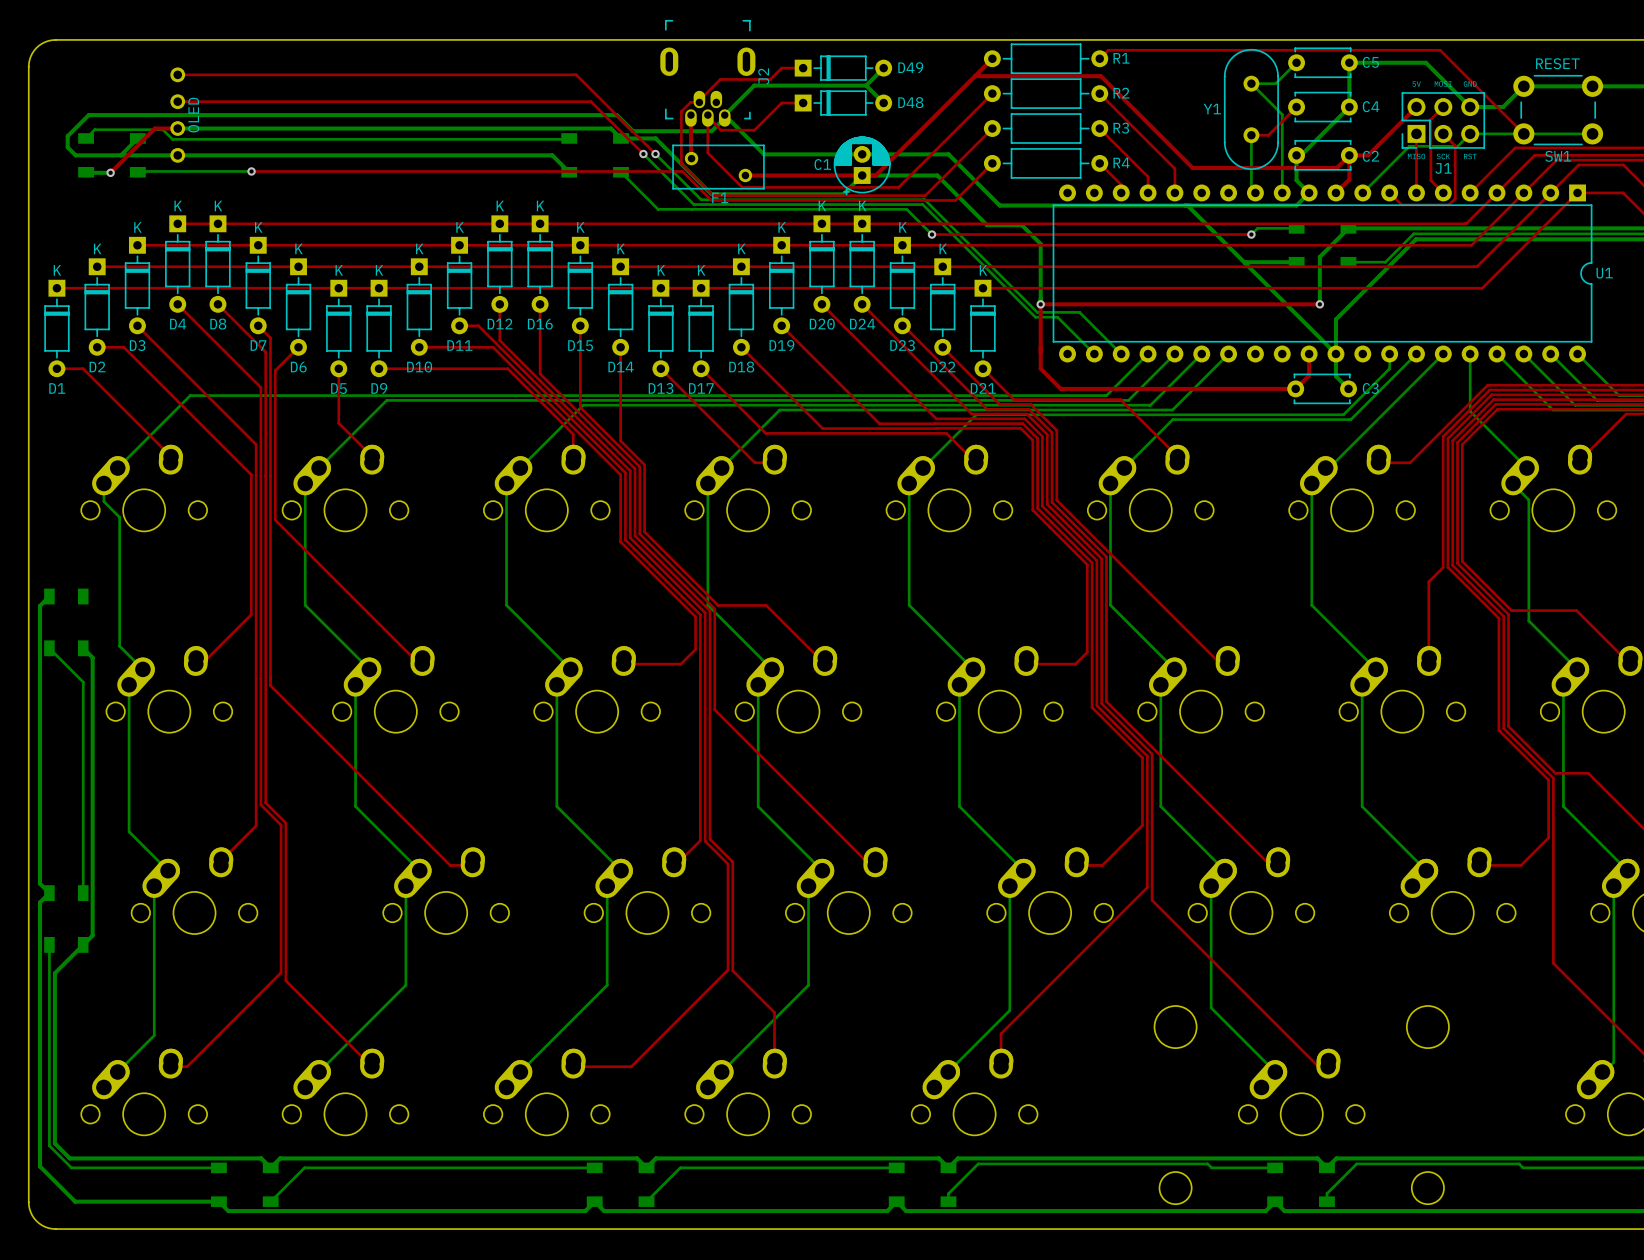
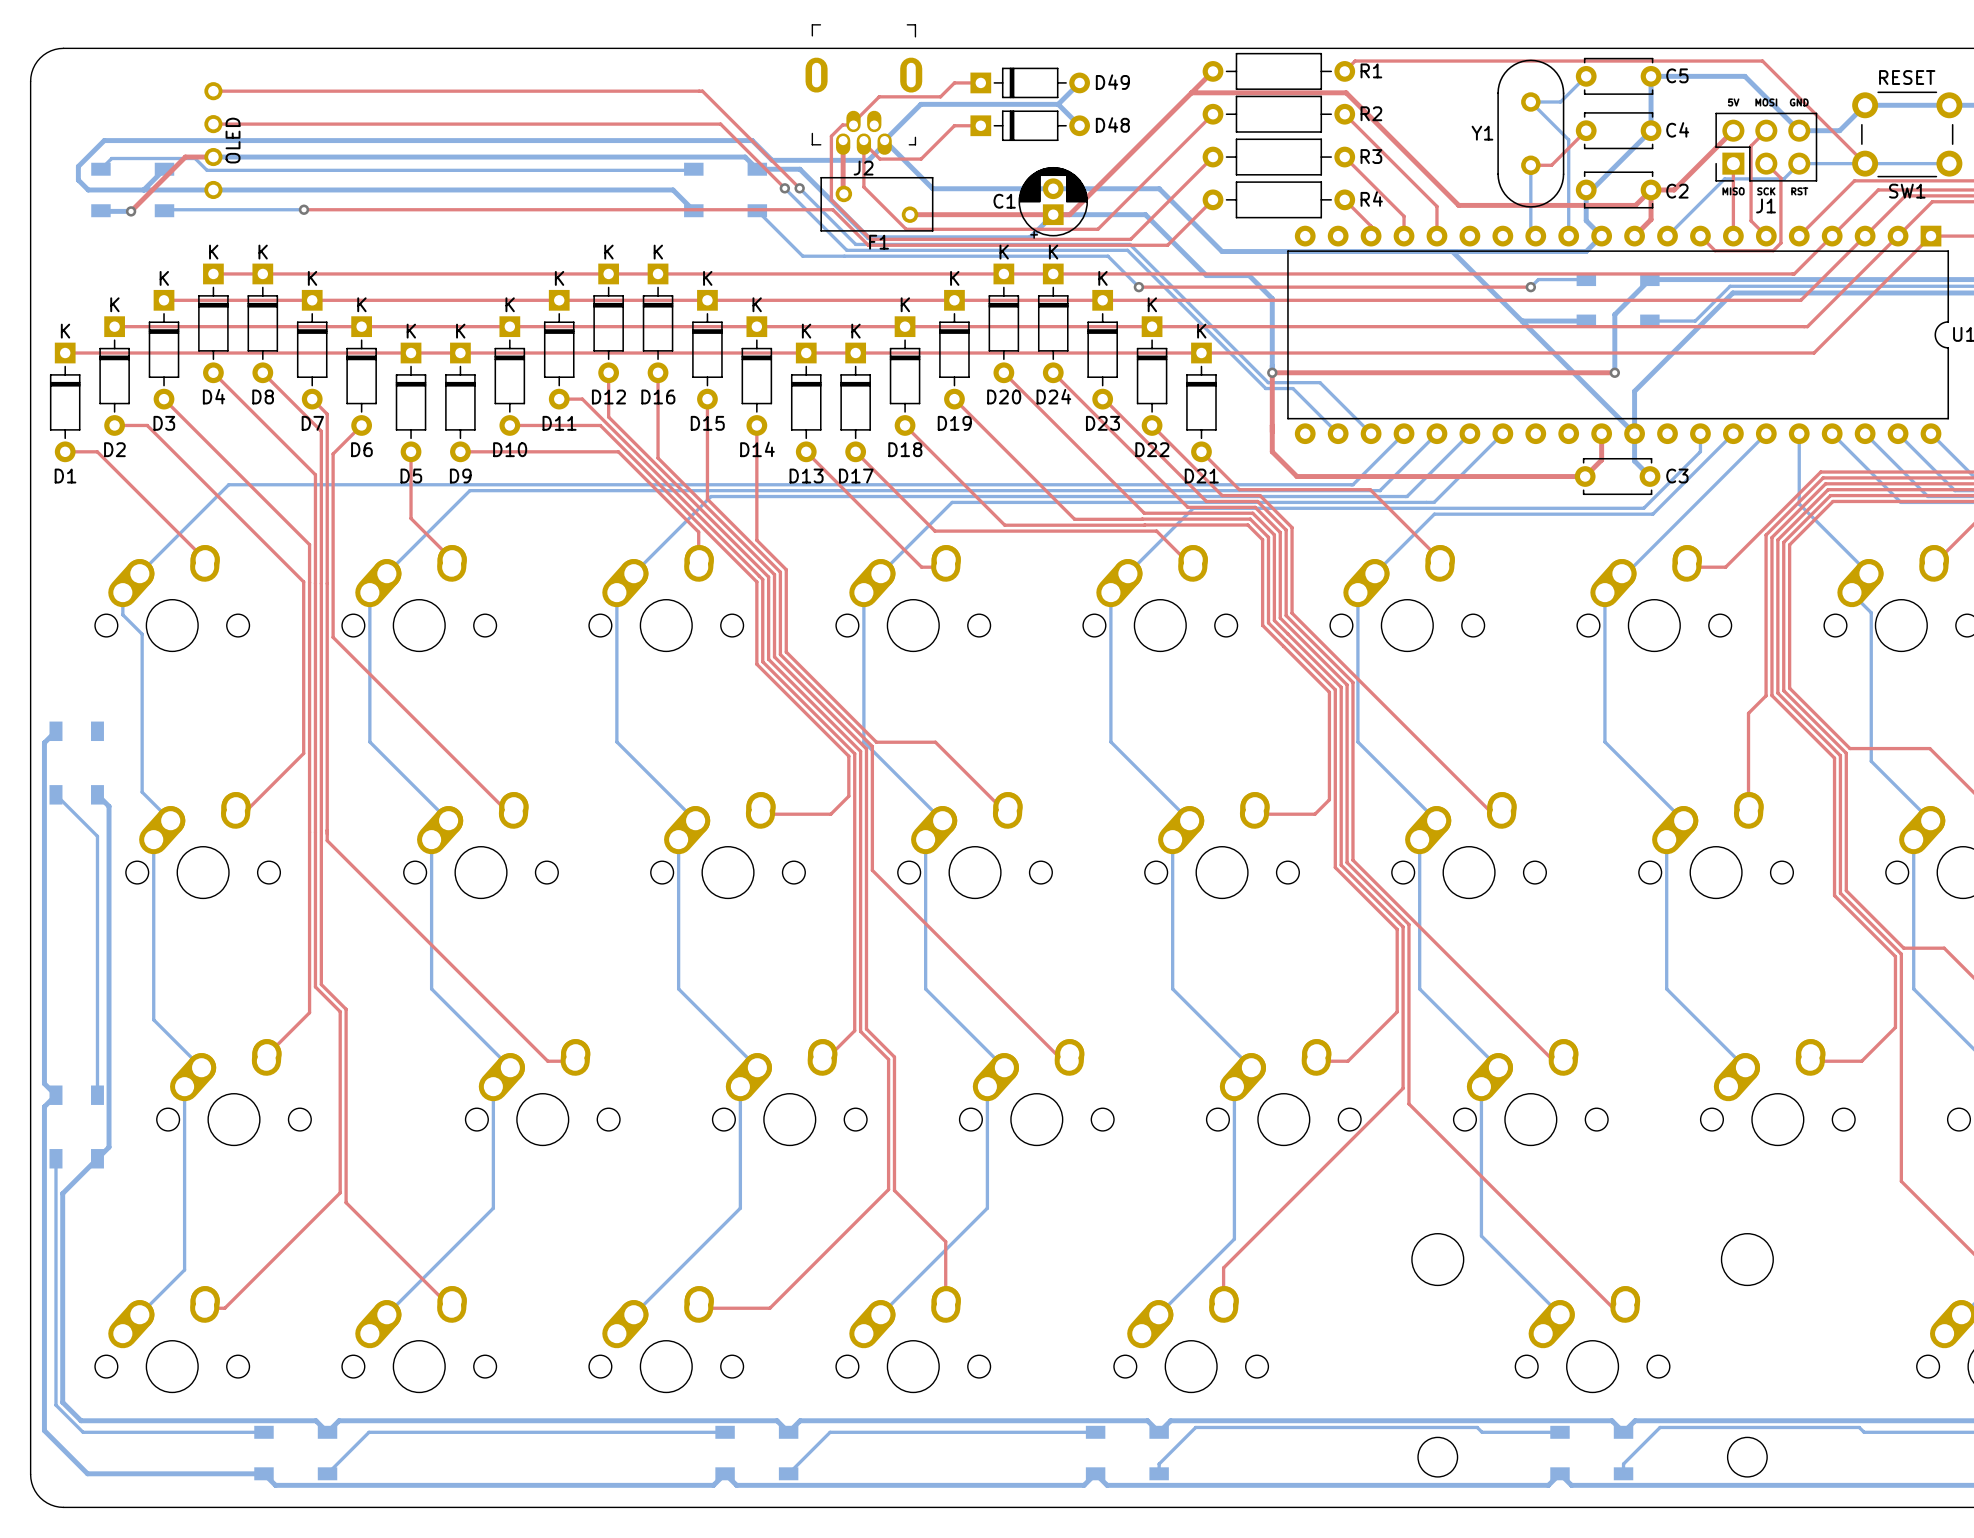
J2 name rotation: 0° (763, 76) -> 90° clockwise (863, 168)
J2 name position: J2 (763, 76) -> J2 (863, 168)

